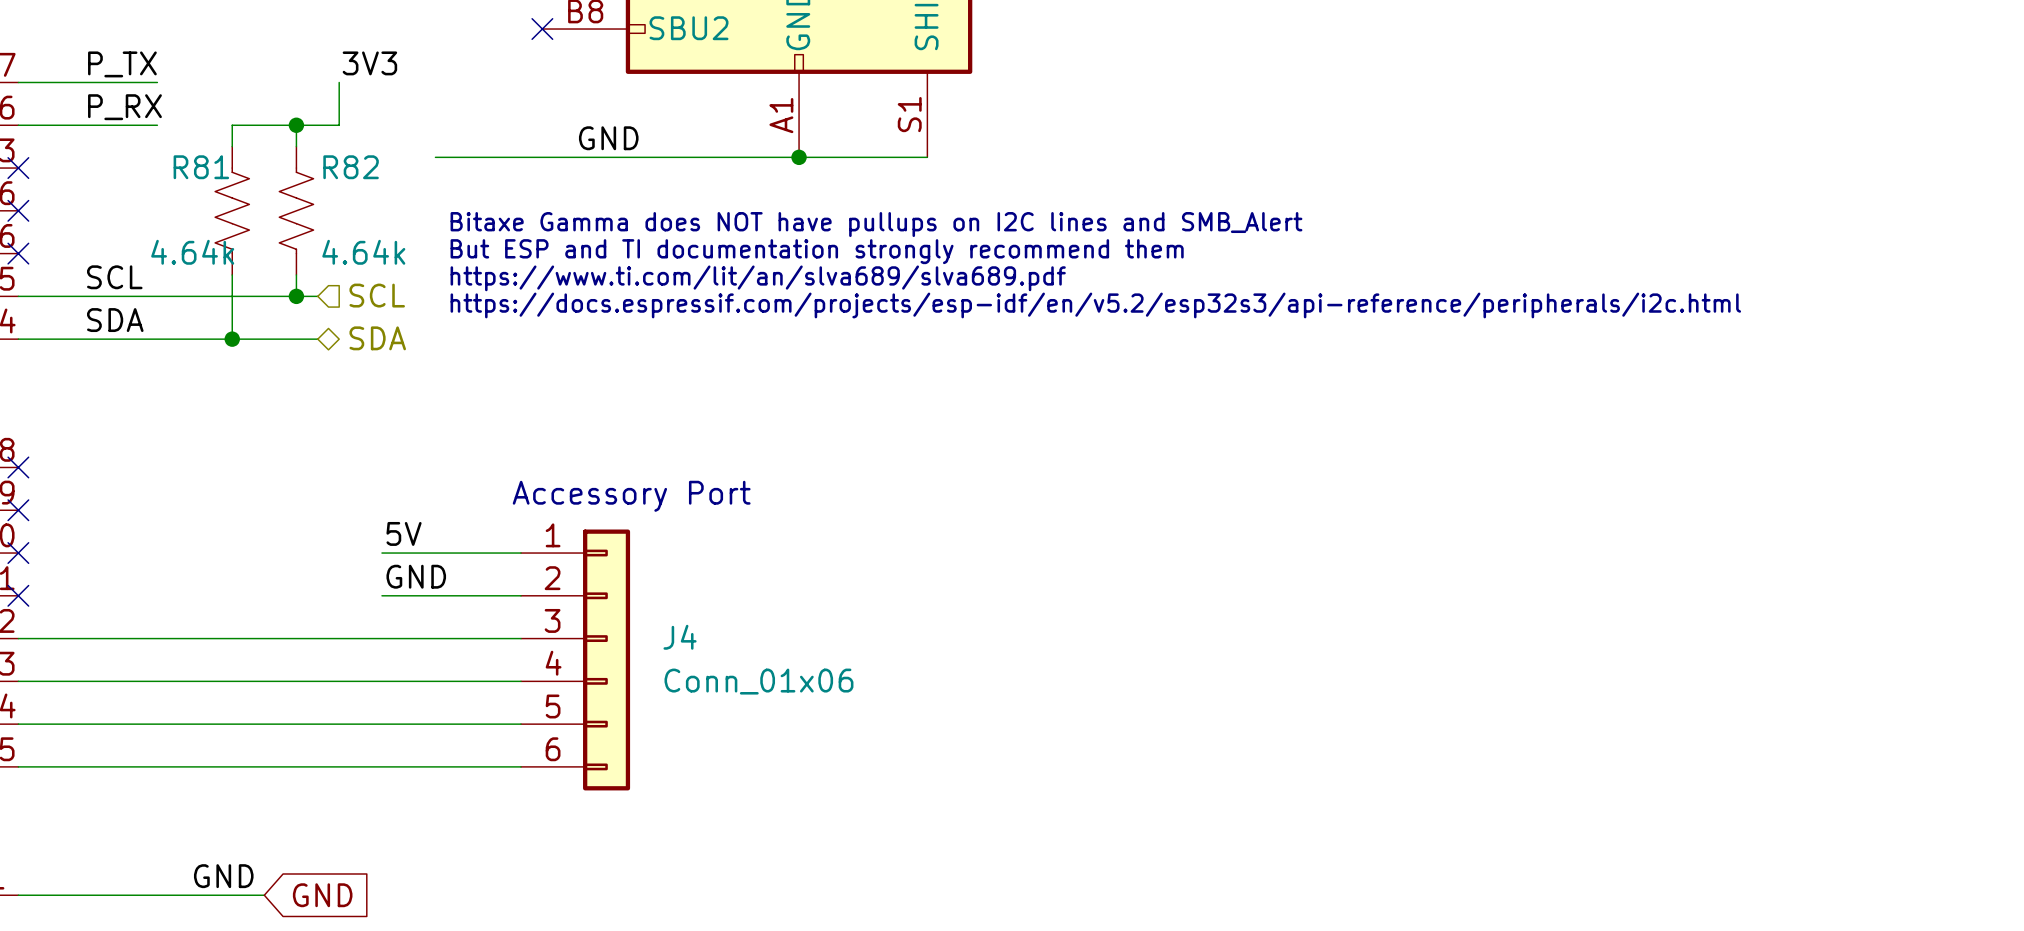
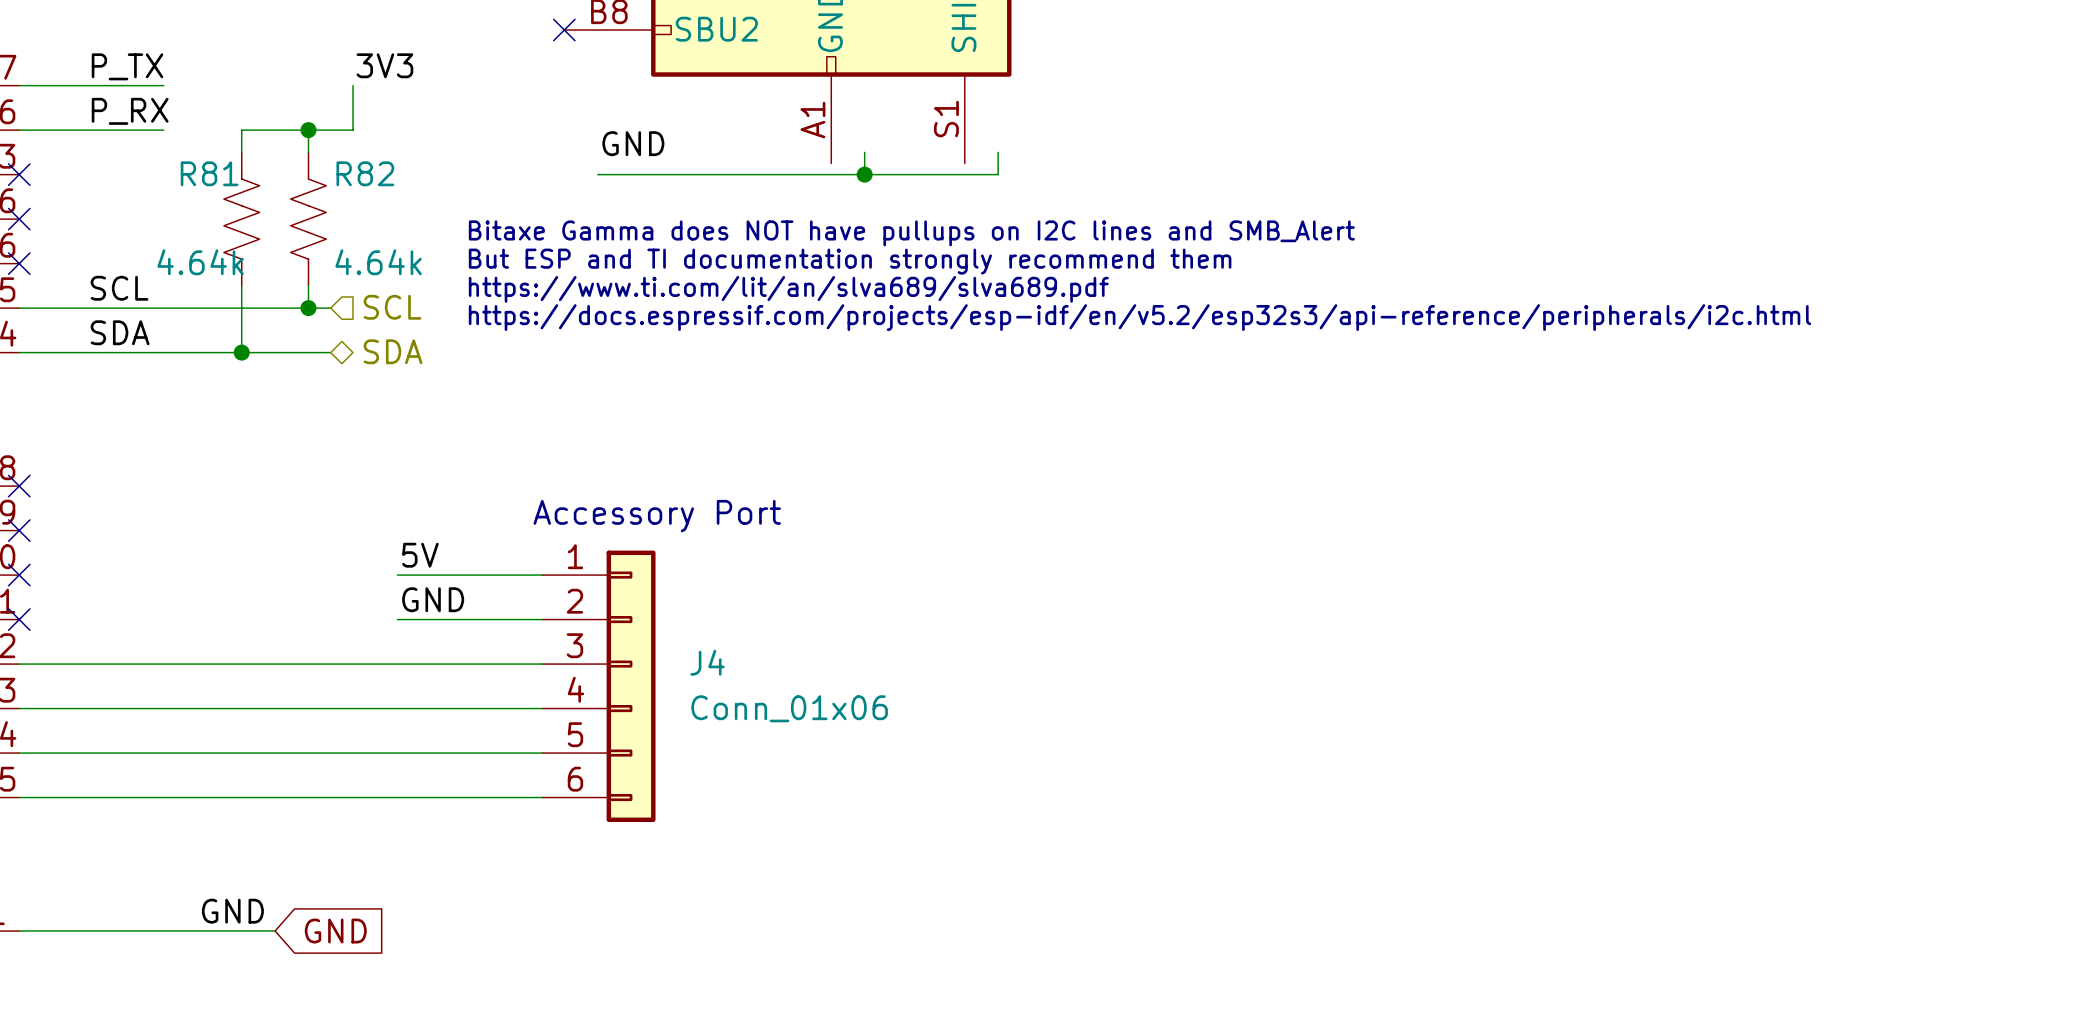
wire: none -> (864, 152) (864, 174)
wire: none -> (998, 152) (998, 174) (597, 174)
wire: (435, 157) (927, 157) -> none
junction position: (799, 157) -> (864, 174)

